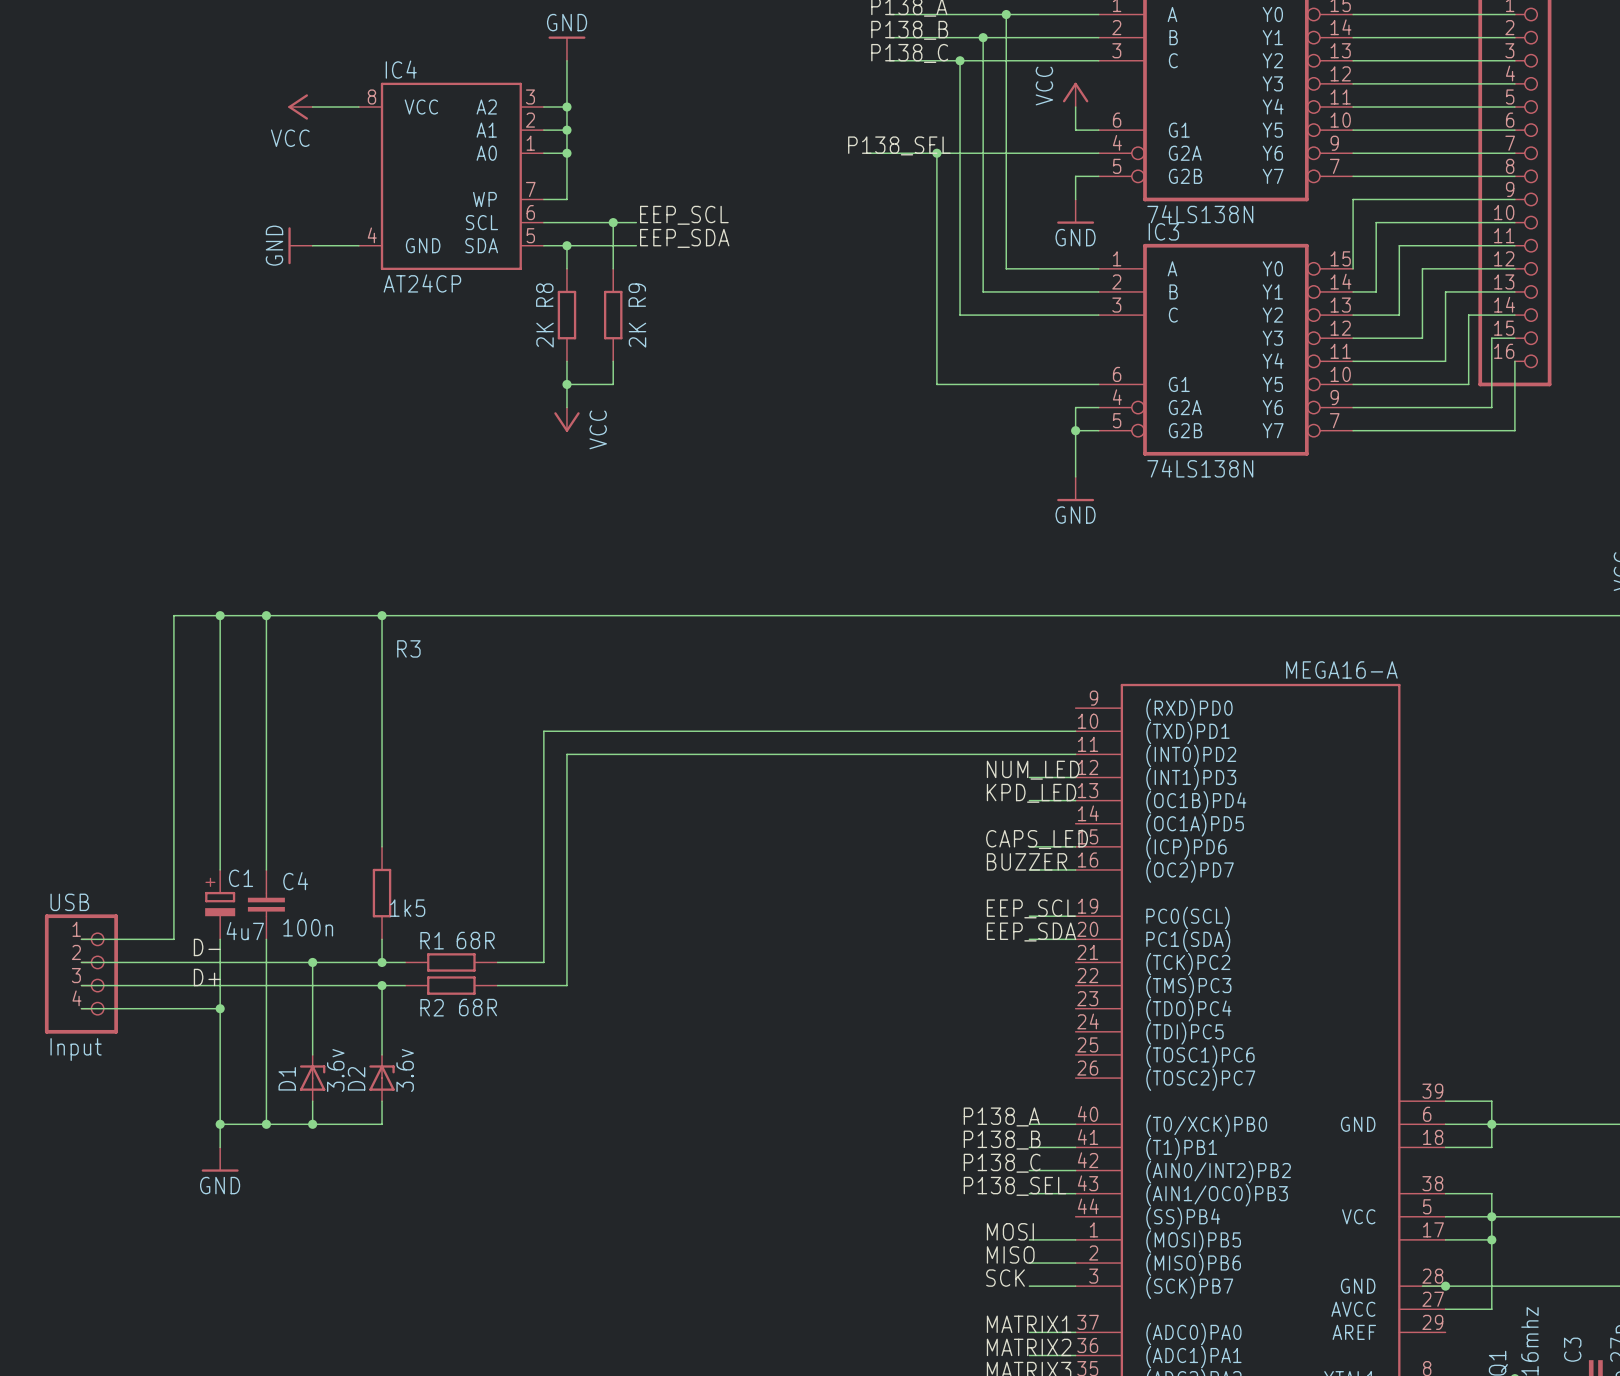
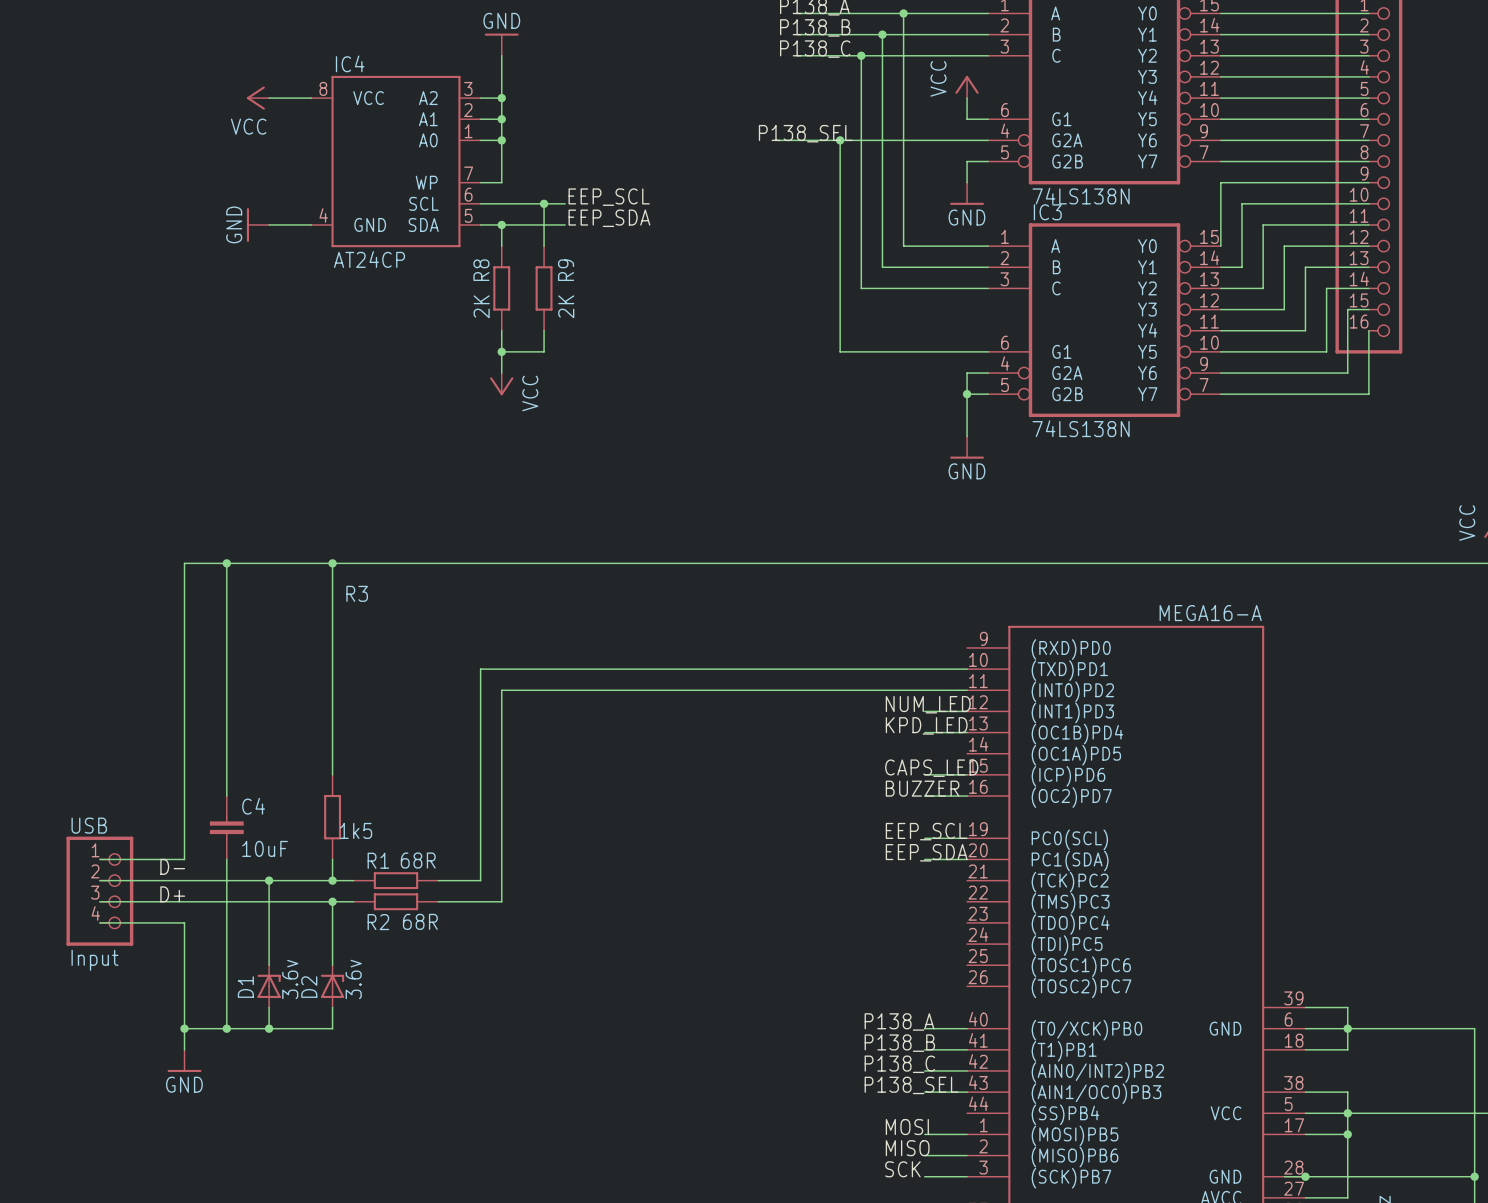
wire: (220, 615) (173, 615) (173, 939) -> (184, 796) (184, 859) (142, 859)
junction: (220, 615) -> none
C1: 4u7 (220, 904) -> none
C4 value: 100n (308, 927) -> 10uF (265, 848)
wire: (81, 939) (127, 939) -> none
wire: (220, 939) (220, 1008) -> none
wire: (81, 962) (127, 962) -> none
USB position: (81, 974) -> (99, 891)
wire: (81, 985) (127, 985) -> none
wire: (81, 1008) (127, 1008) -> none
junction: (220, 1008) -> none

